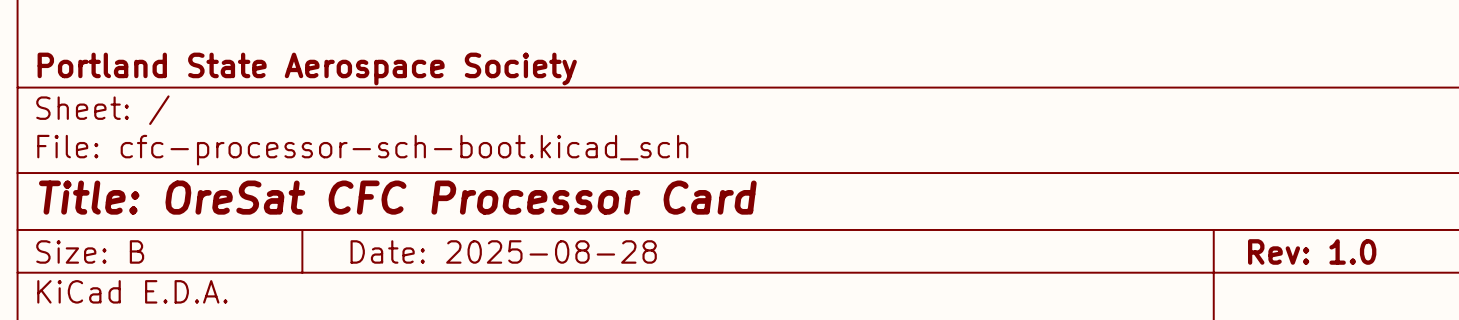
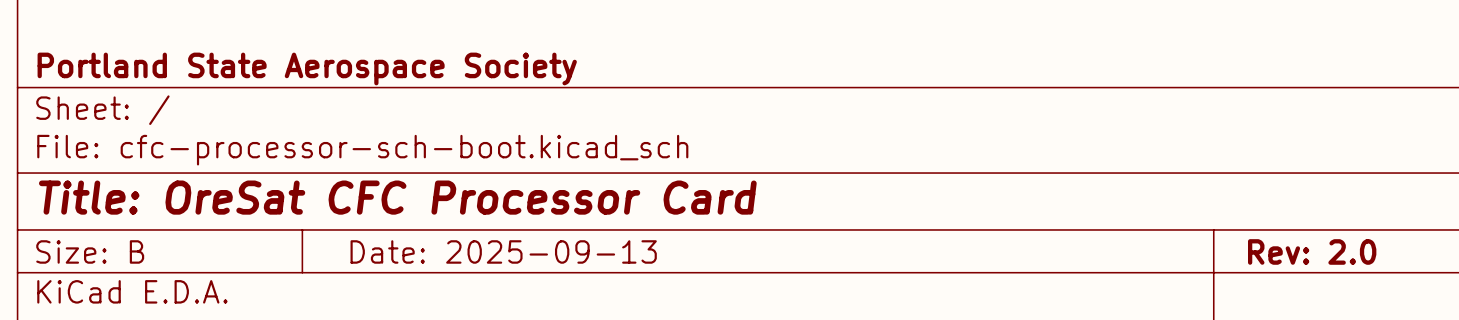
title block: Date: 2025-08-28 (503, 251) -> Date: 2025-09-13 (503, 251)
title block: Rev: 1.0 (1312, 251) -> Rev: 2.0 (1312, 251)

